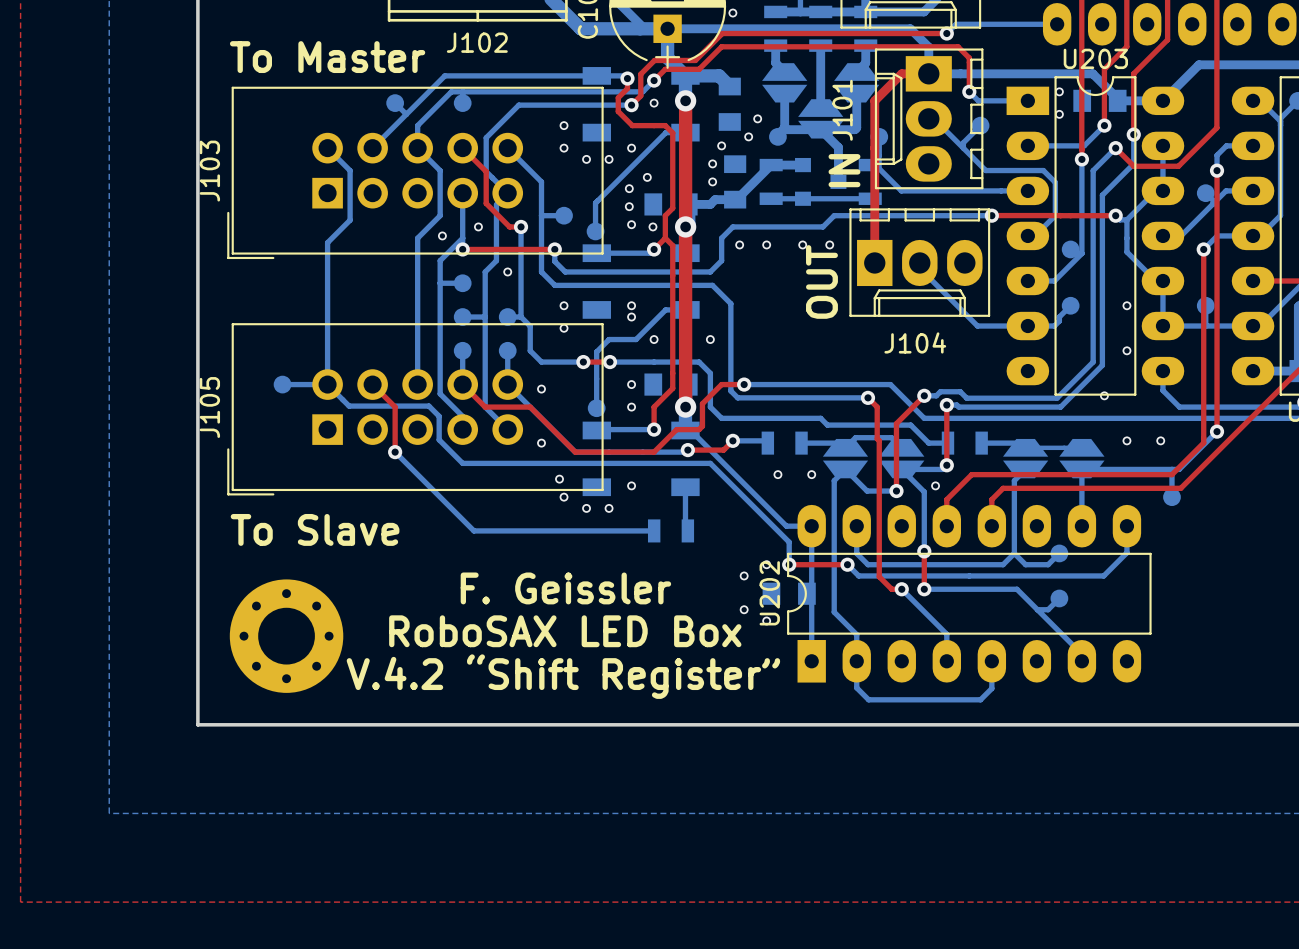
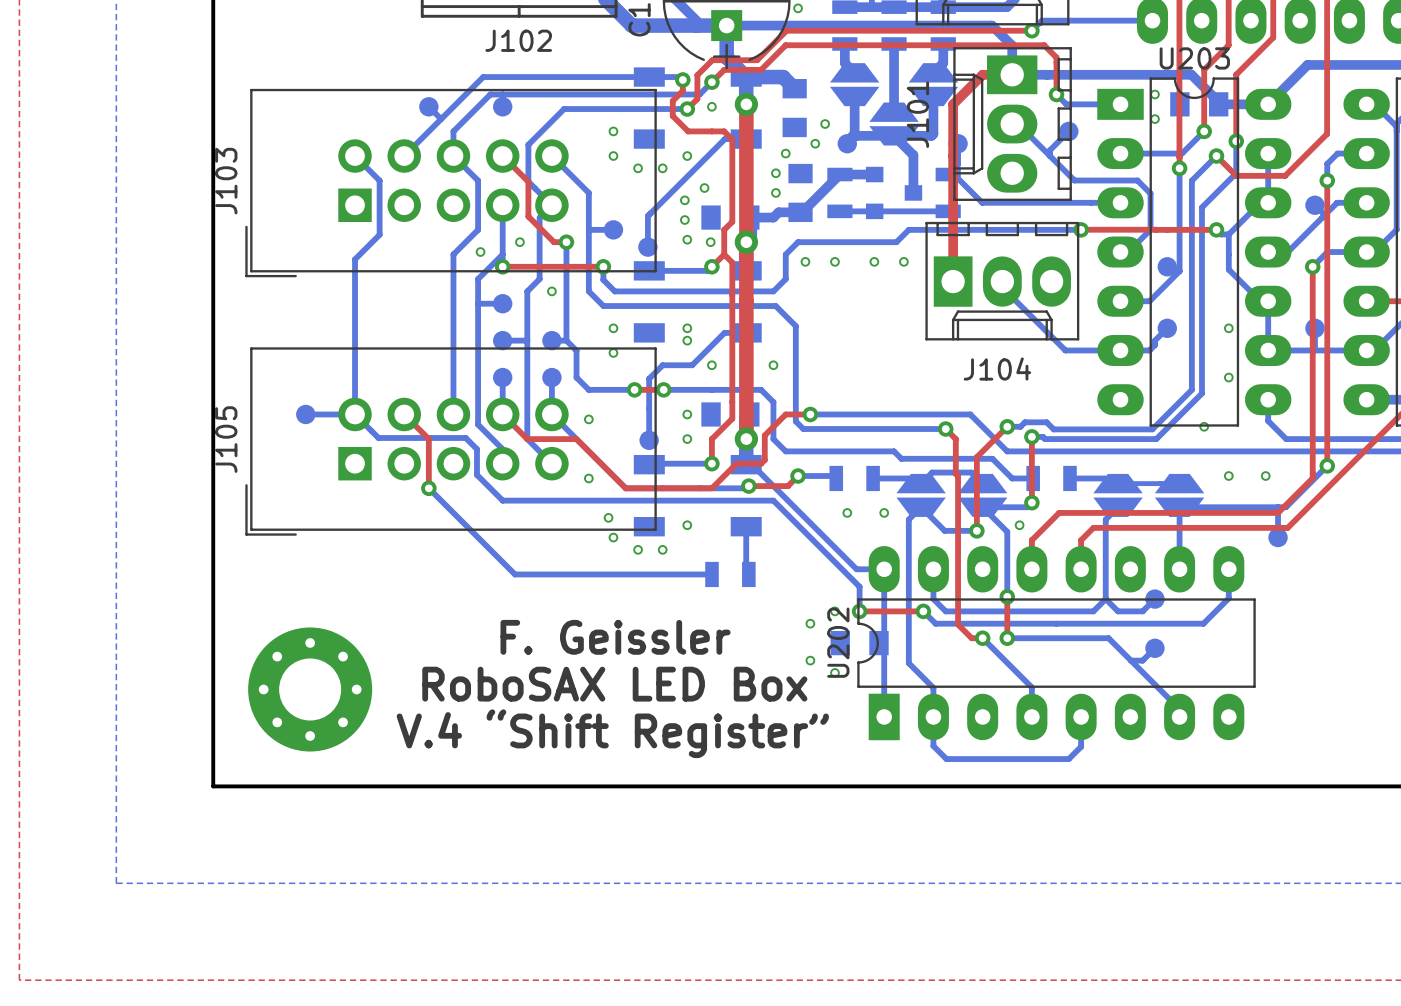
text: To Master (327, 57) -> none
text: IN (844, 170) -> none
text: OUT (821, 281) -> none
text: To Slave (315, 529) -> none
text: V.4.2 “Shift Register” (563, 676) -> V.4 “Shift Register” (612, 733)

